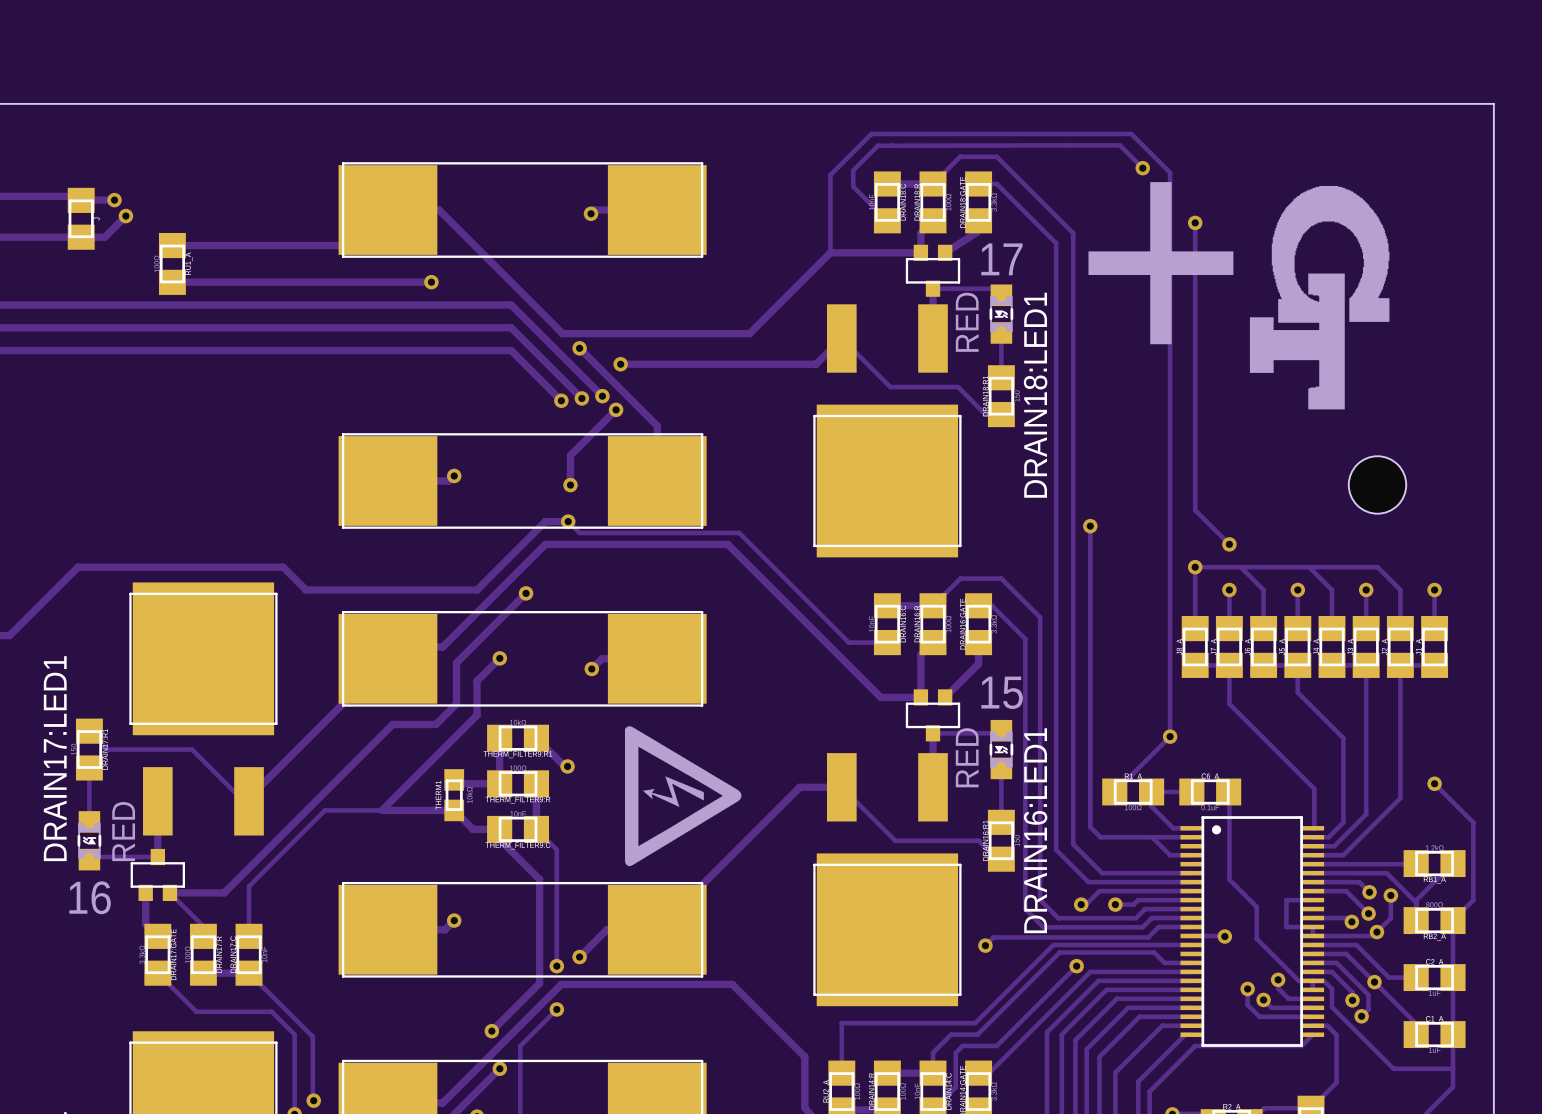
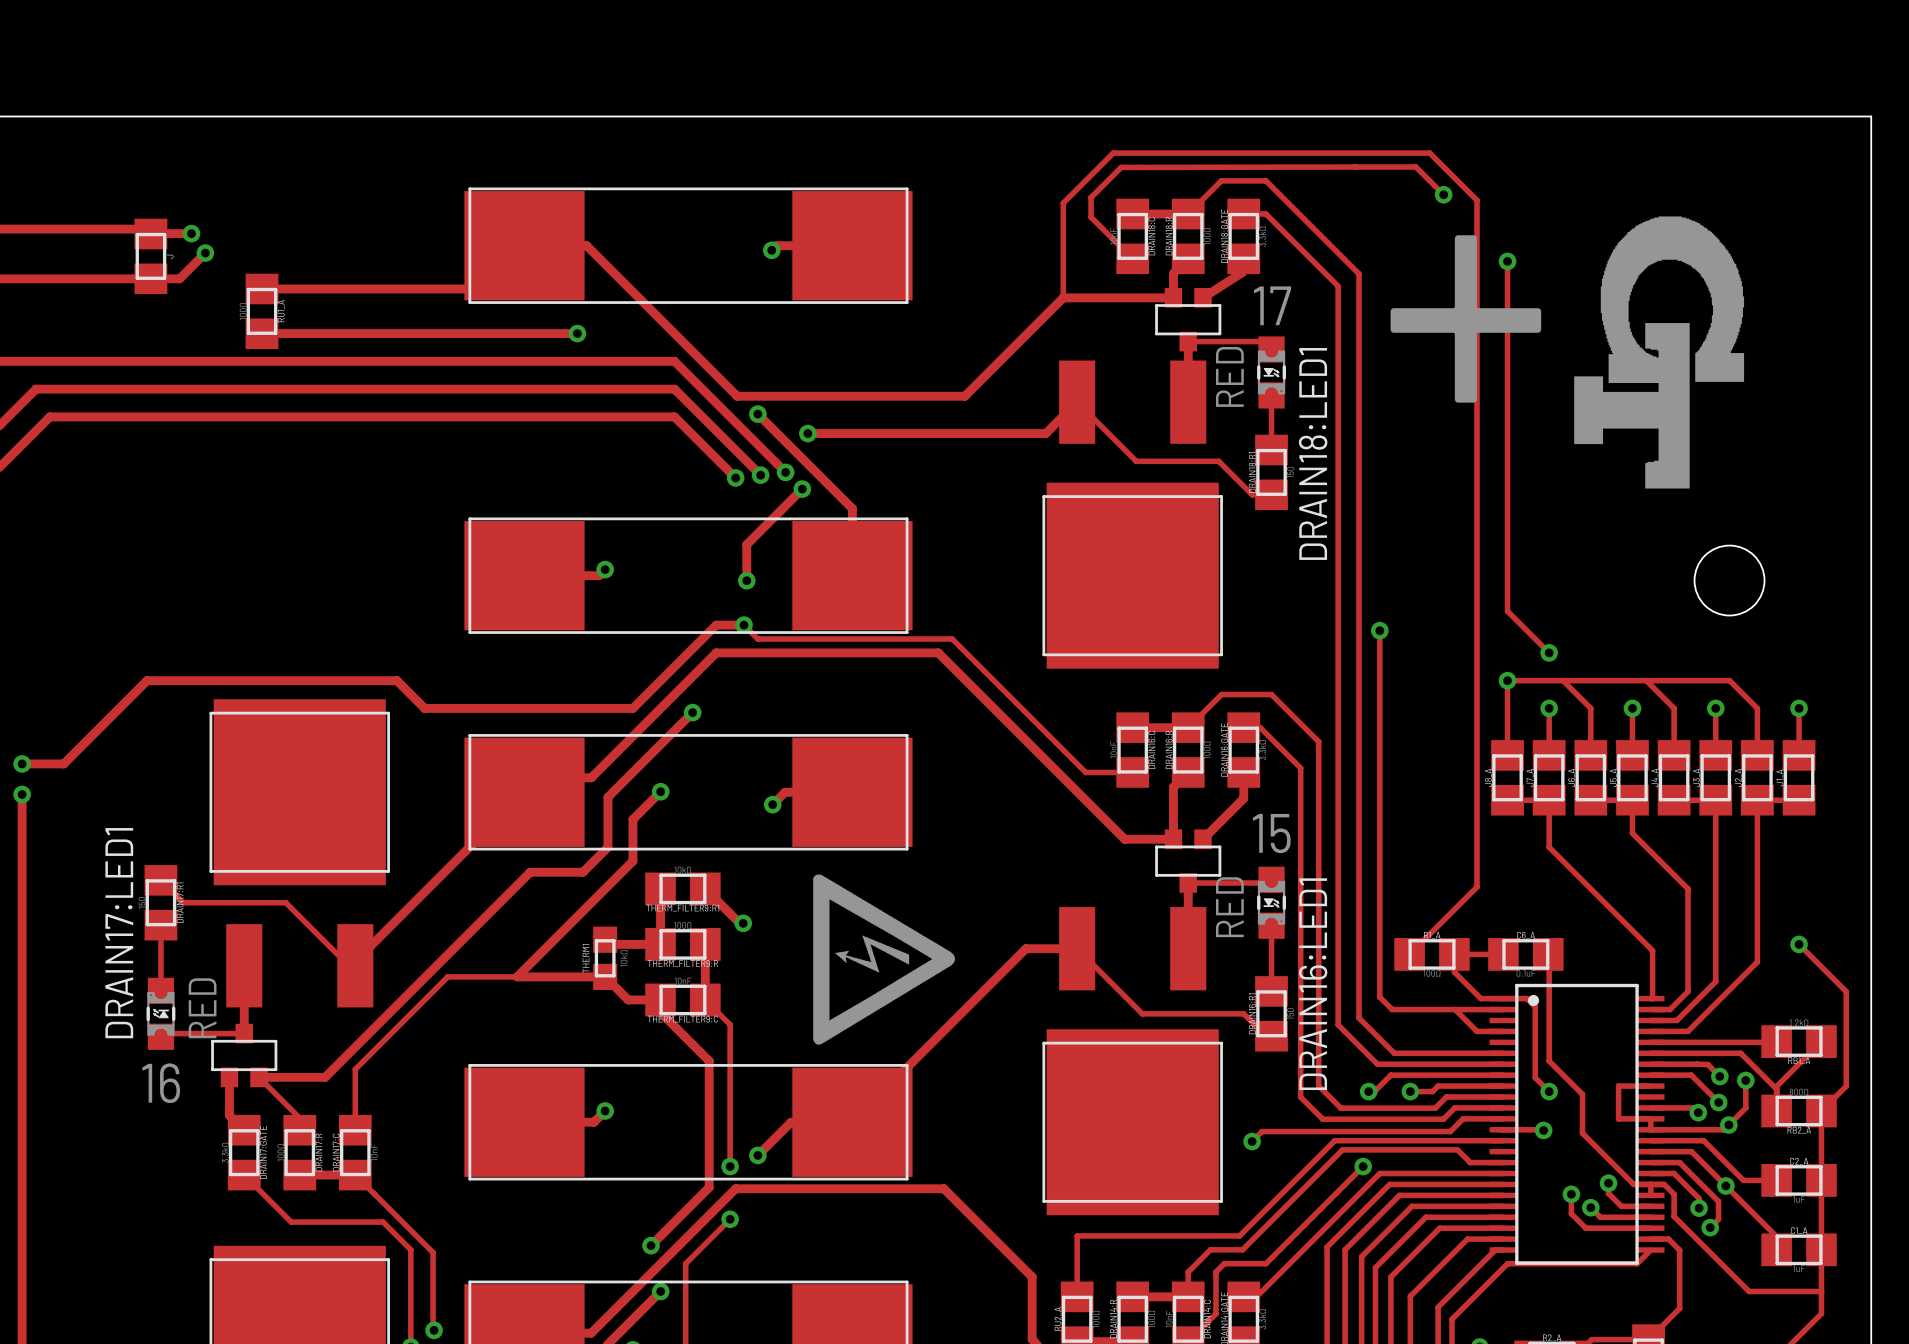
via: (1170, 736) -> none
track: none -> (1503, 998) (1526, 998) (1535, 1006) (1535, 1077) (1549, 1091)
via: none -> (1549, 1091)

